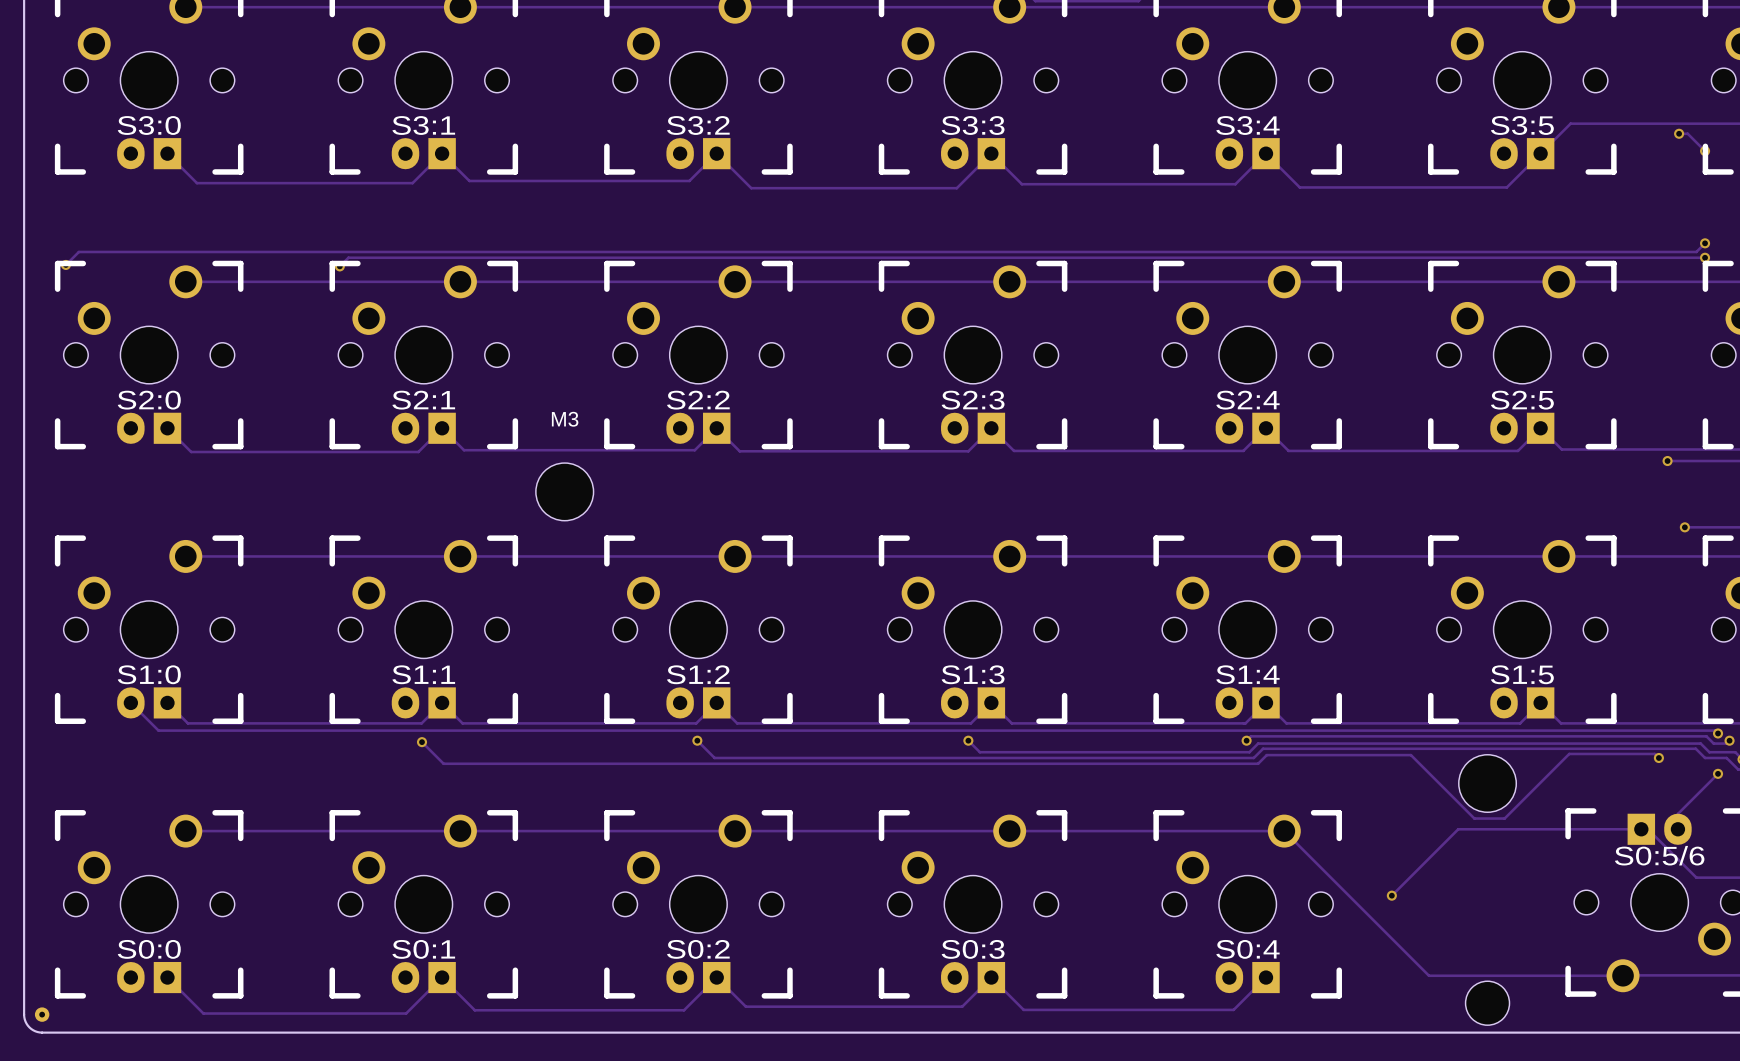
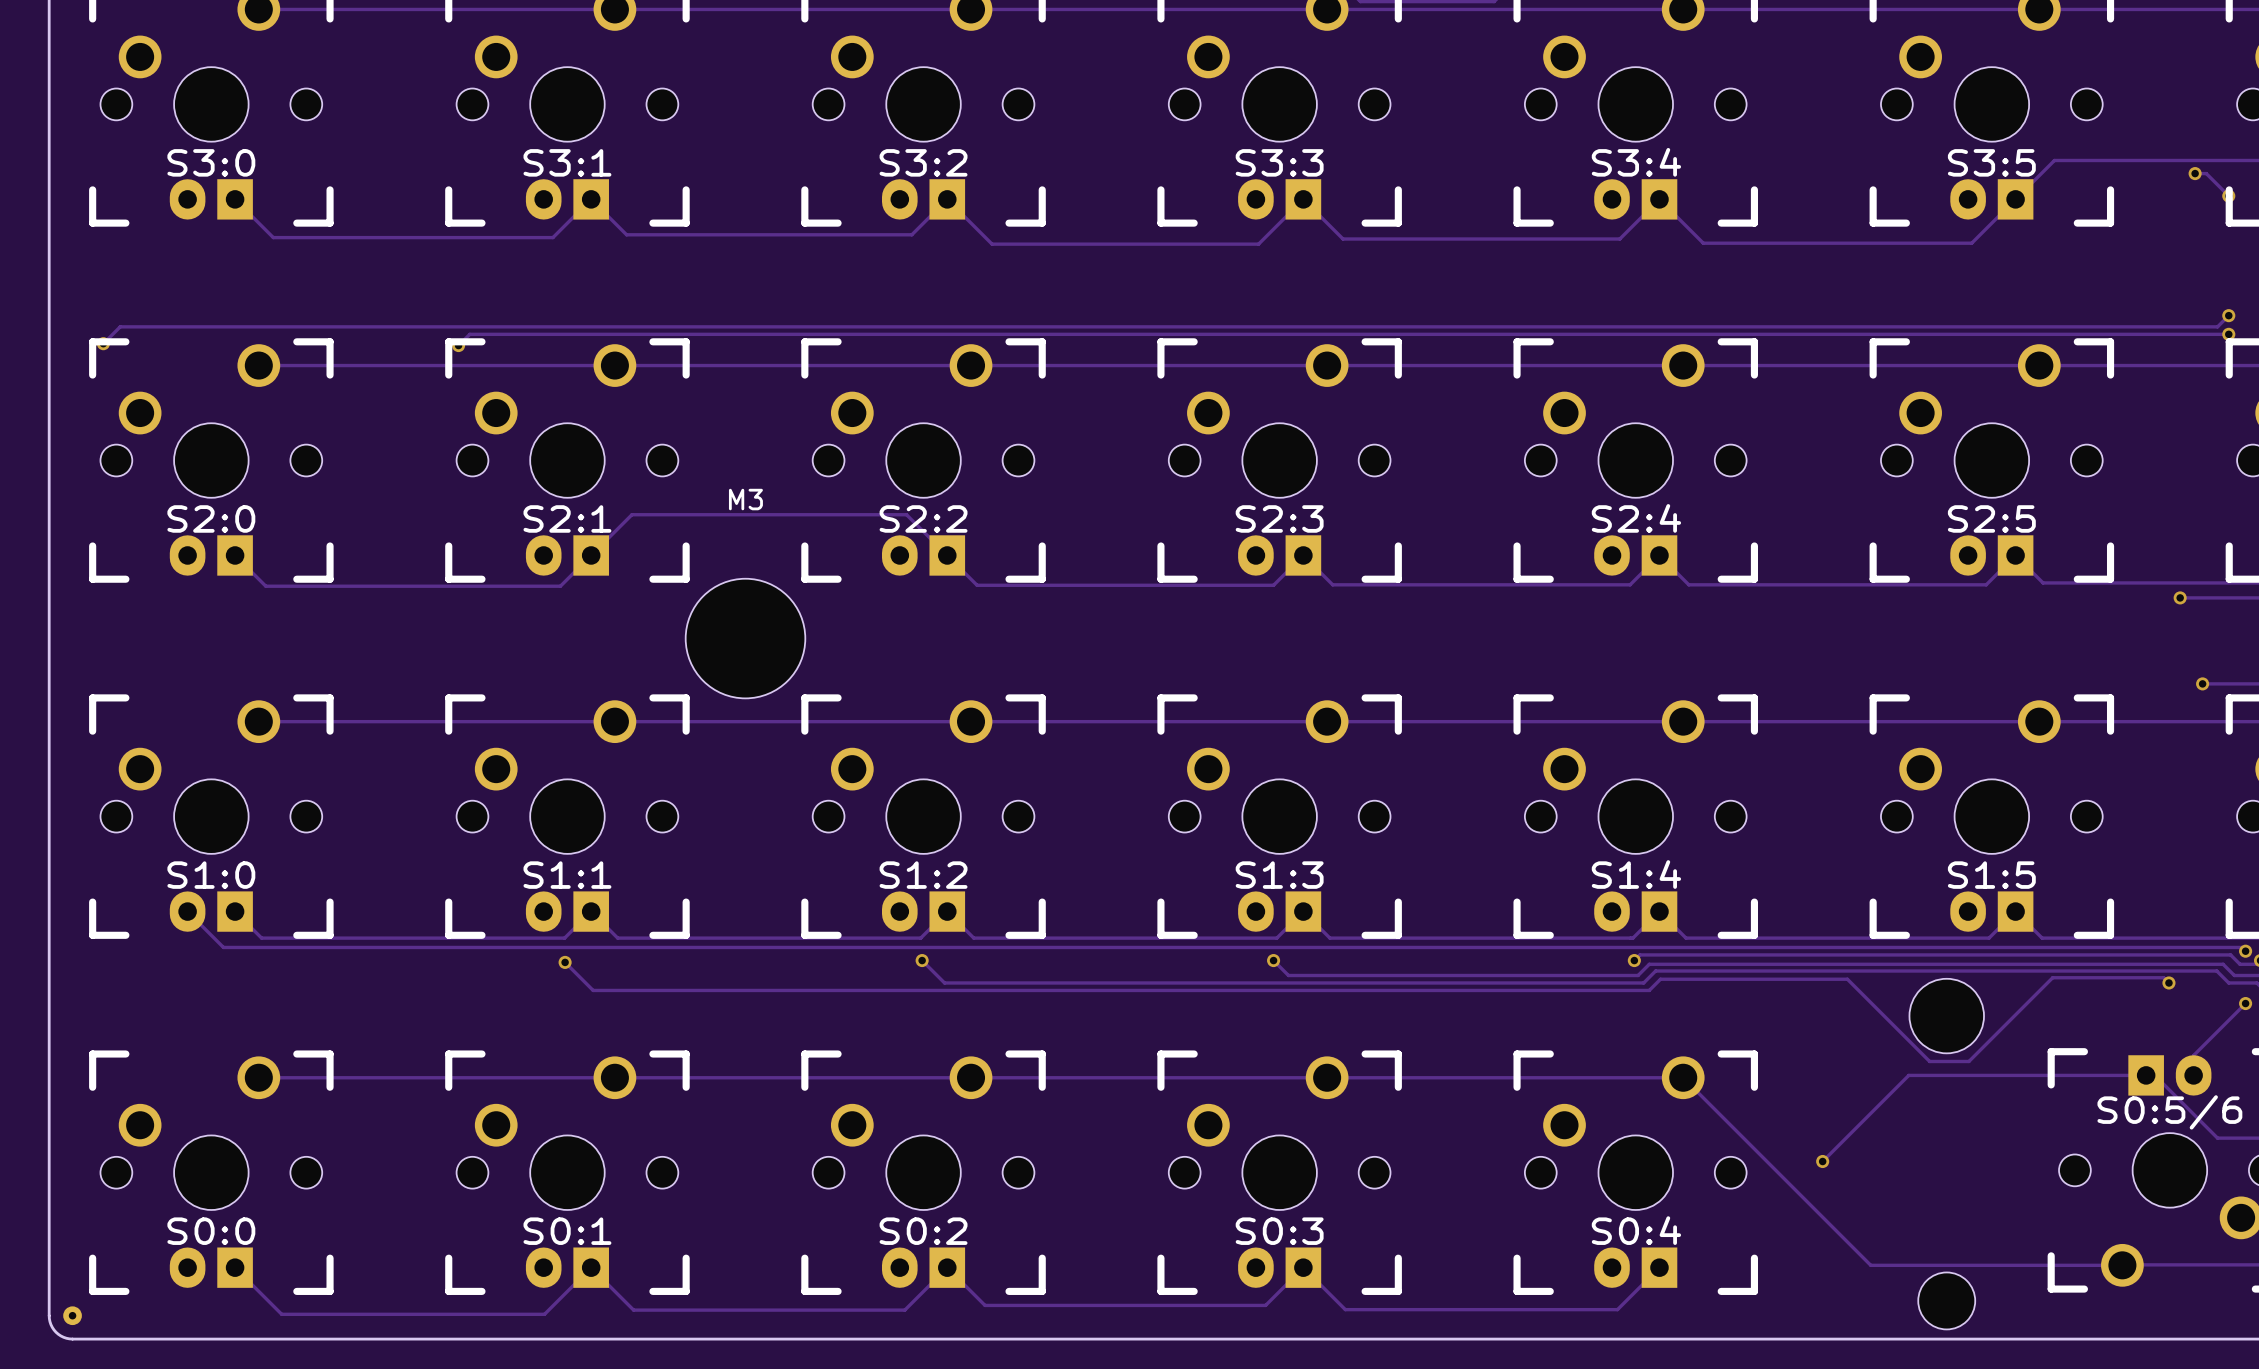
M3 name position: M3 (565, 419) -> M3 (745, 499)
track: (442, 428) (464, 450) (694, 450) (716, 428) -> (591, 555) (631, 514) (906, 514) (947, 555)
M3 footprint: [535, 463, 594, 521] -> [685, 578, 806, 699]

